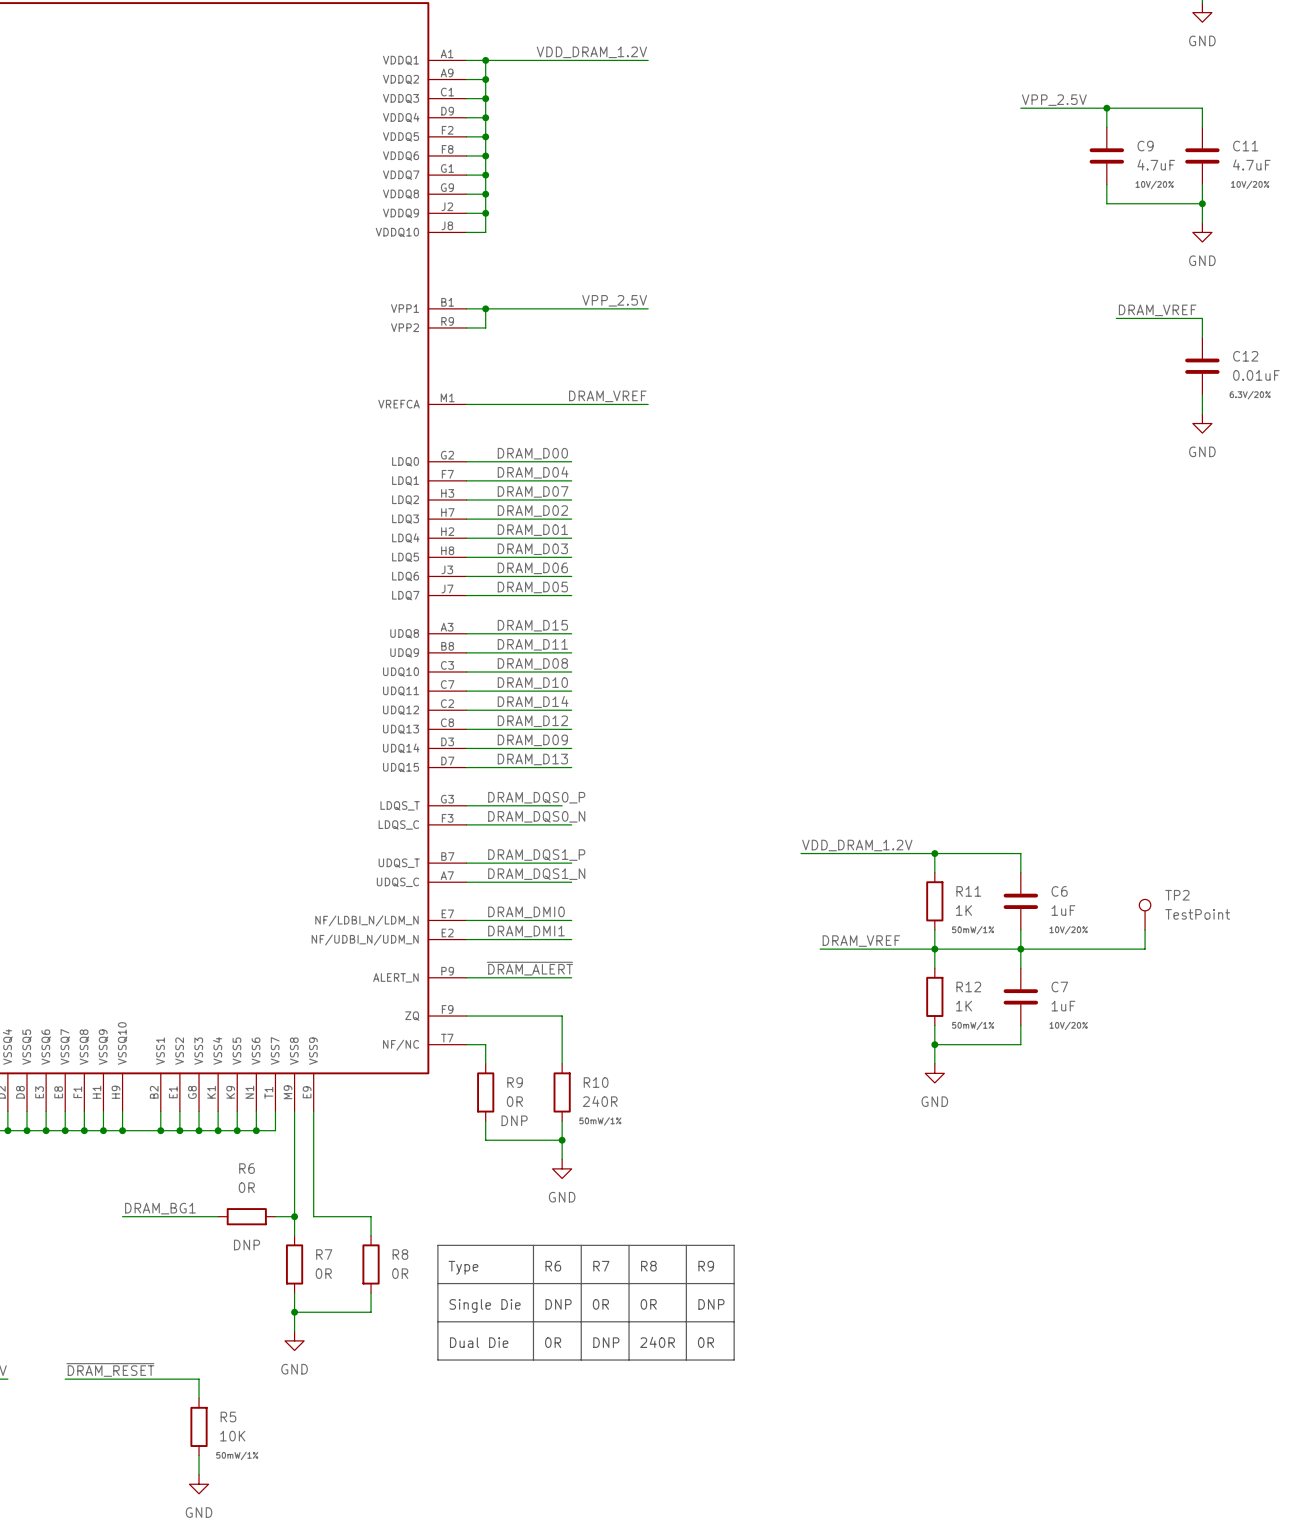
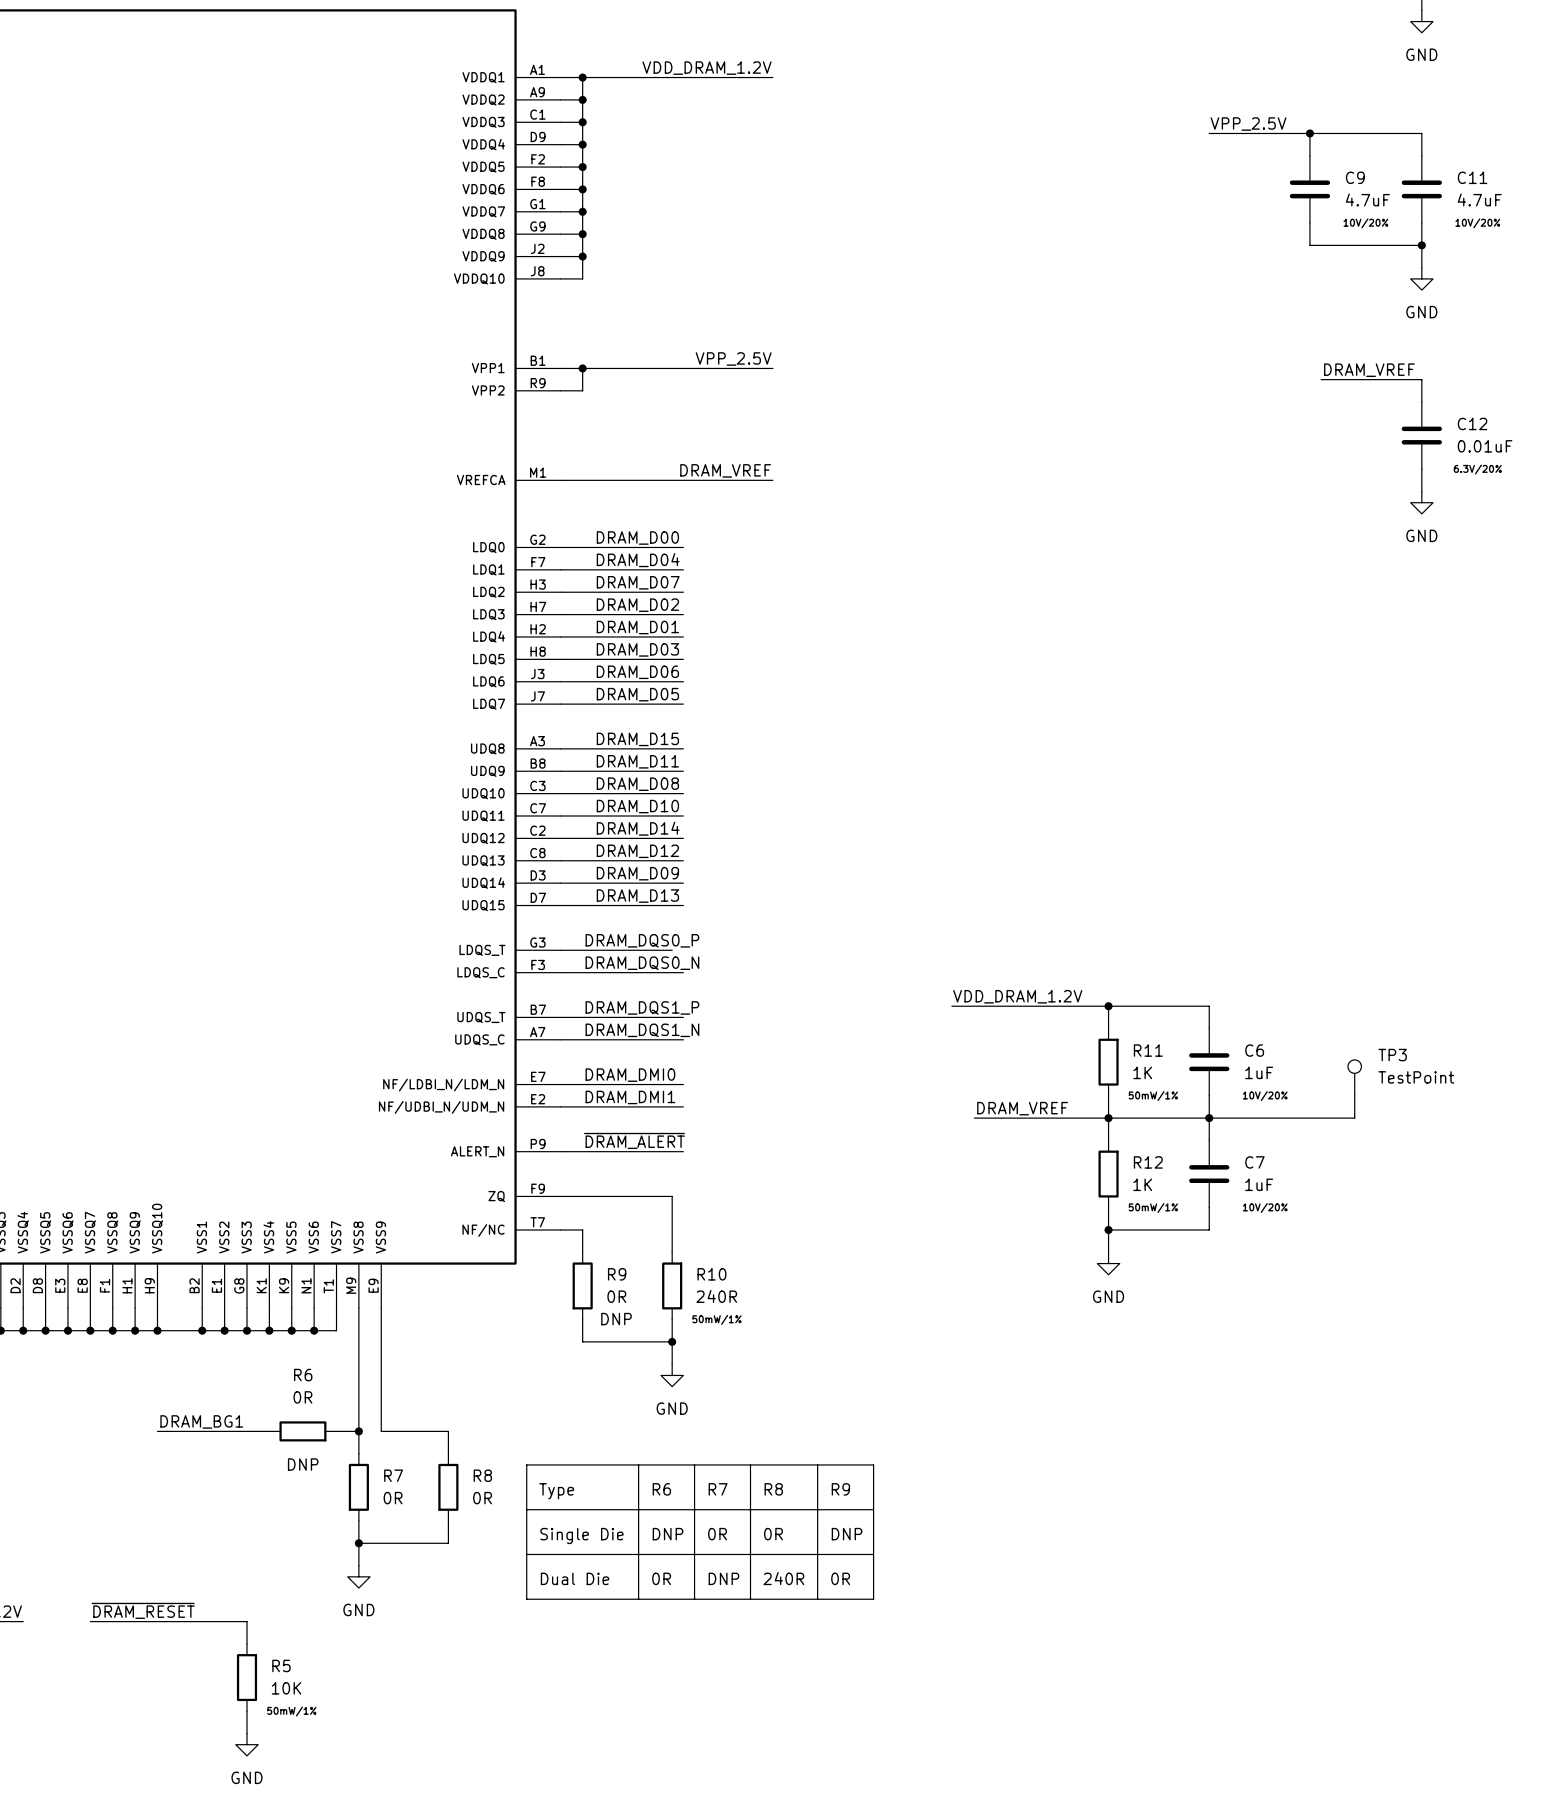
TP2 name: TP2 (1177, 895) -> TP3 (1392, 1055)

